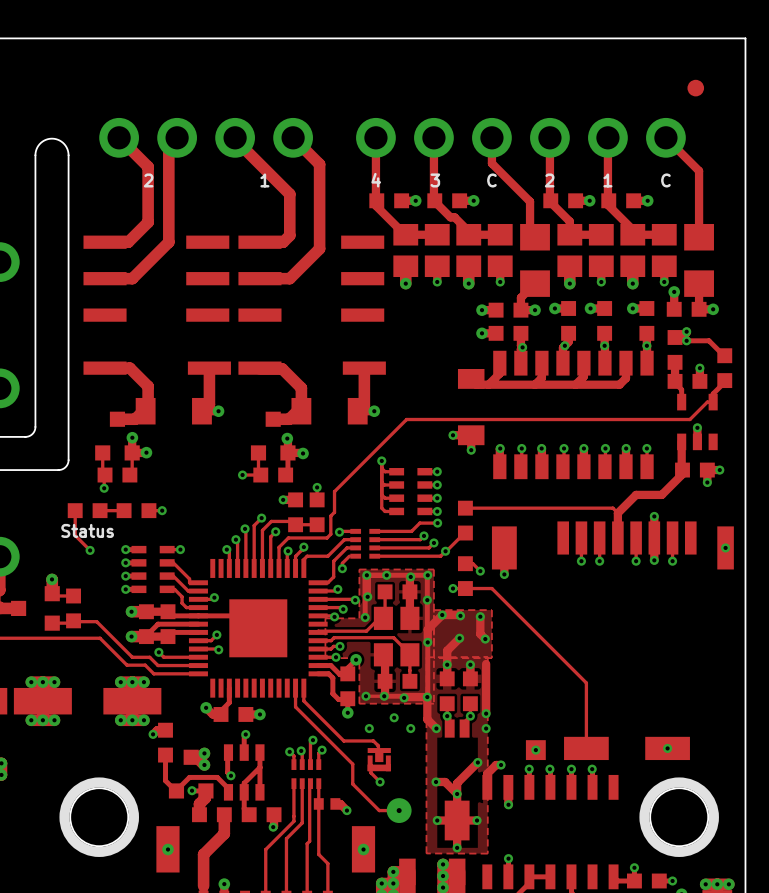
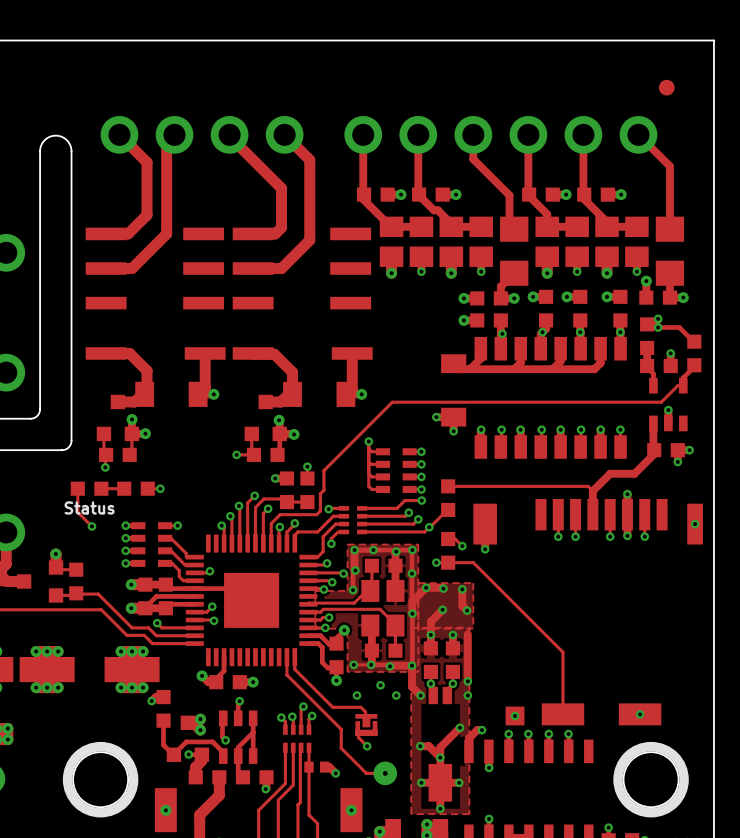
text: 2 (148, 180) -> none
text: 1 (264, 180) -> none
text: 4 (376, 180) -> none
text: 3 (435, 180) -> none
text: C (491, 180) -> none
text: 2 (549, 180) -> none
text: 1 (607, 180) -> none
text: C (665, 180) -> none

